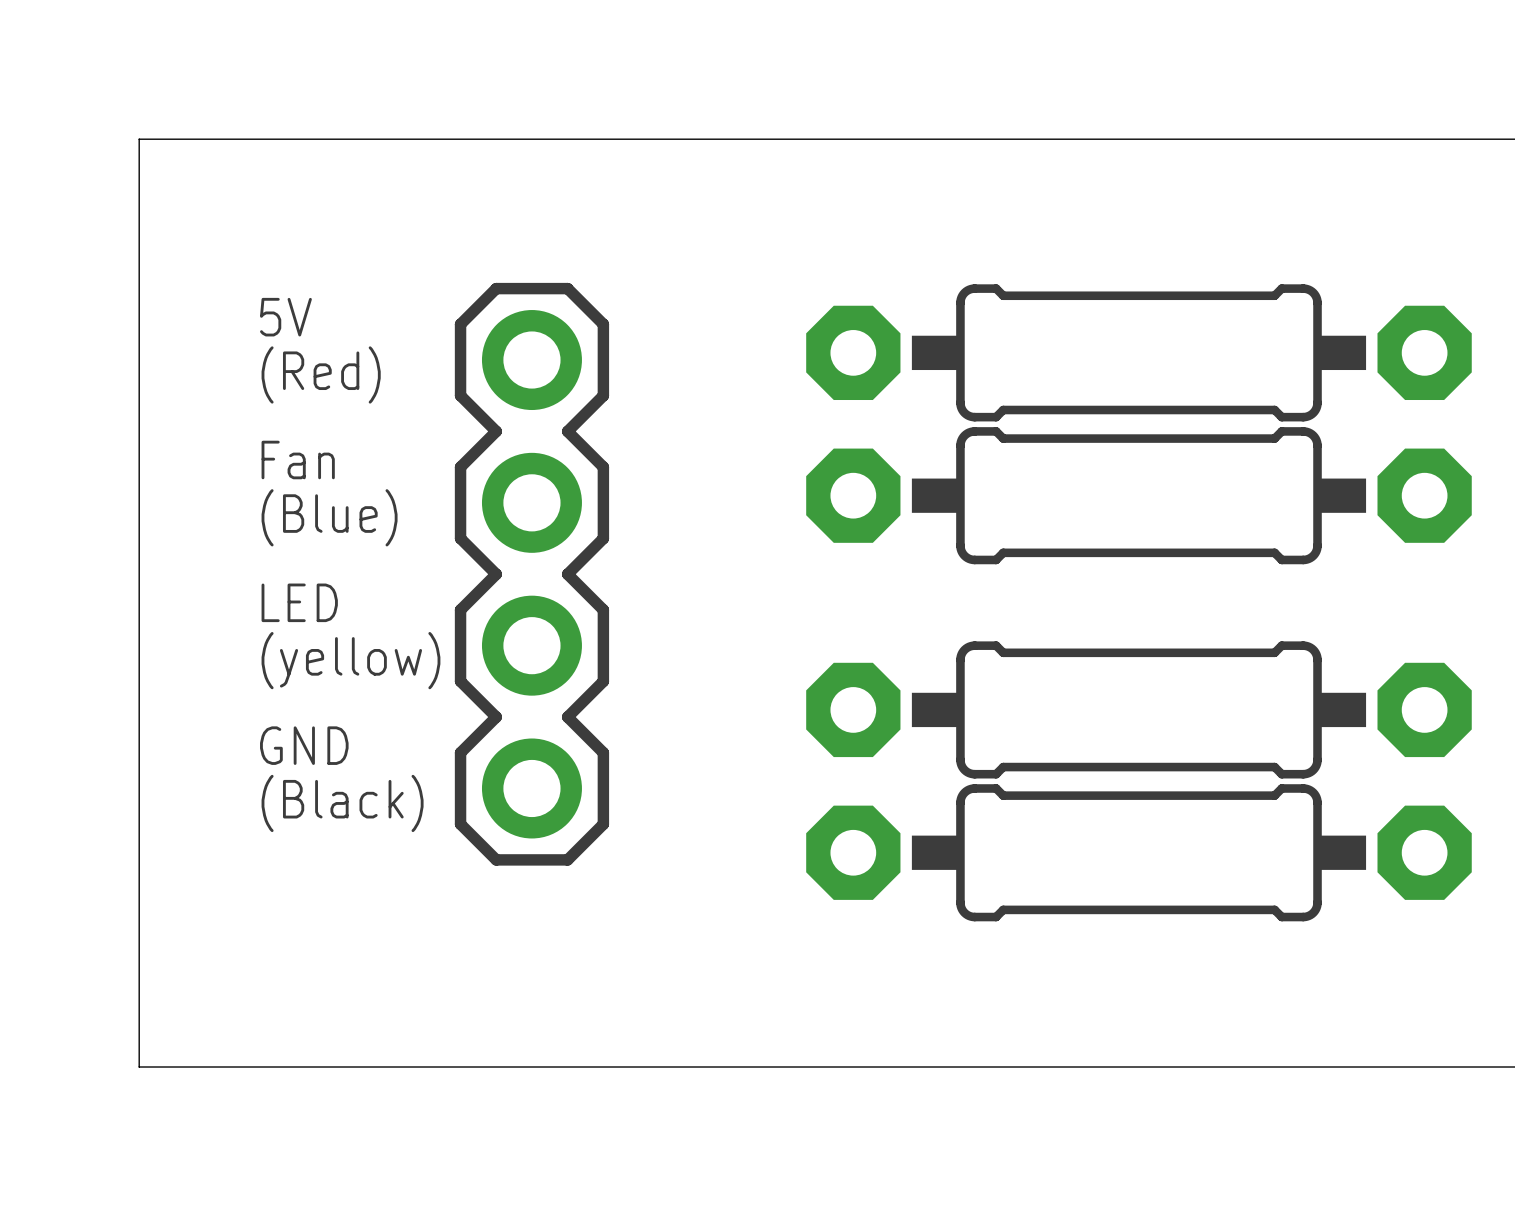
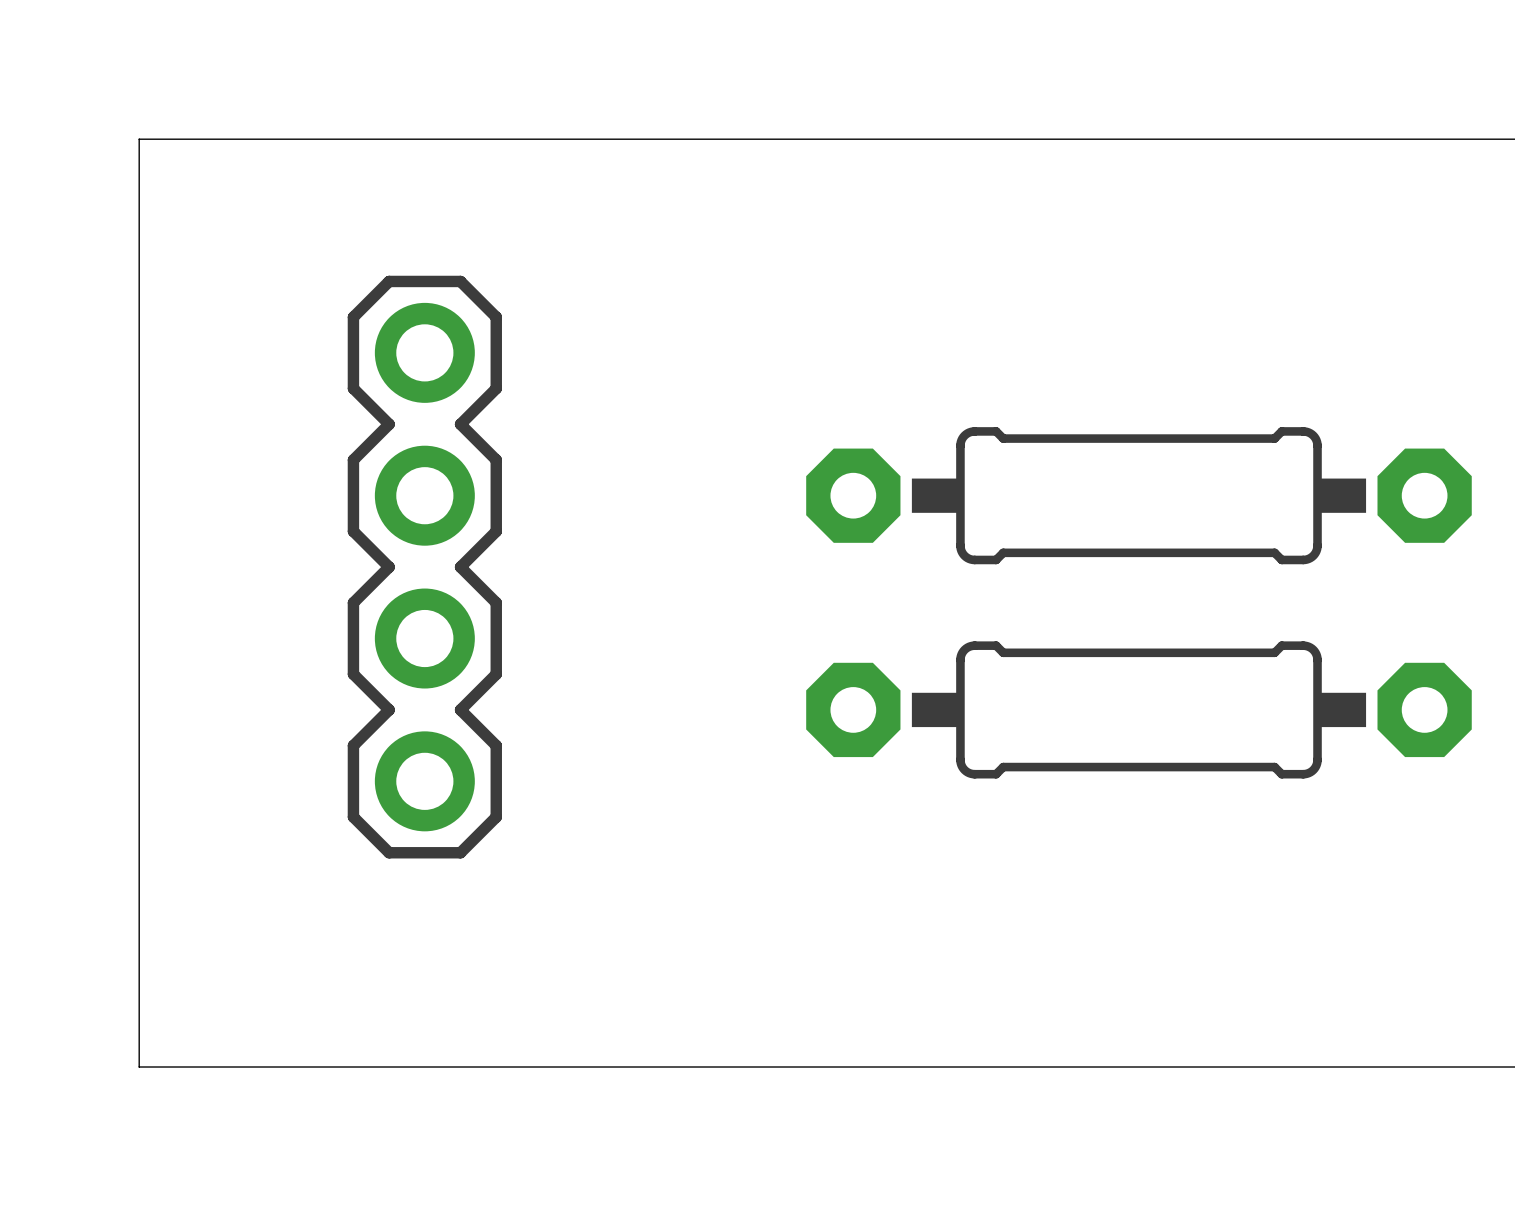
text: 5V (285, 317) -> none
part: (1138, 352) -> none
text: (Red) (321, 374) -> none
text: Fan (298, 459) -> none
text: (Blue) (329, 517) -> none
part position: (531, 574) -> (424, 567)
text: LED (299, 602) -> none
text: (yellow) (350, 660) -> none
text: GND (304, 745) -> none
text: (Black) (342, 803) -> none
part: (1138, 852) -> none

